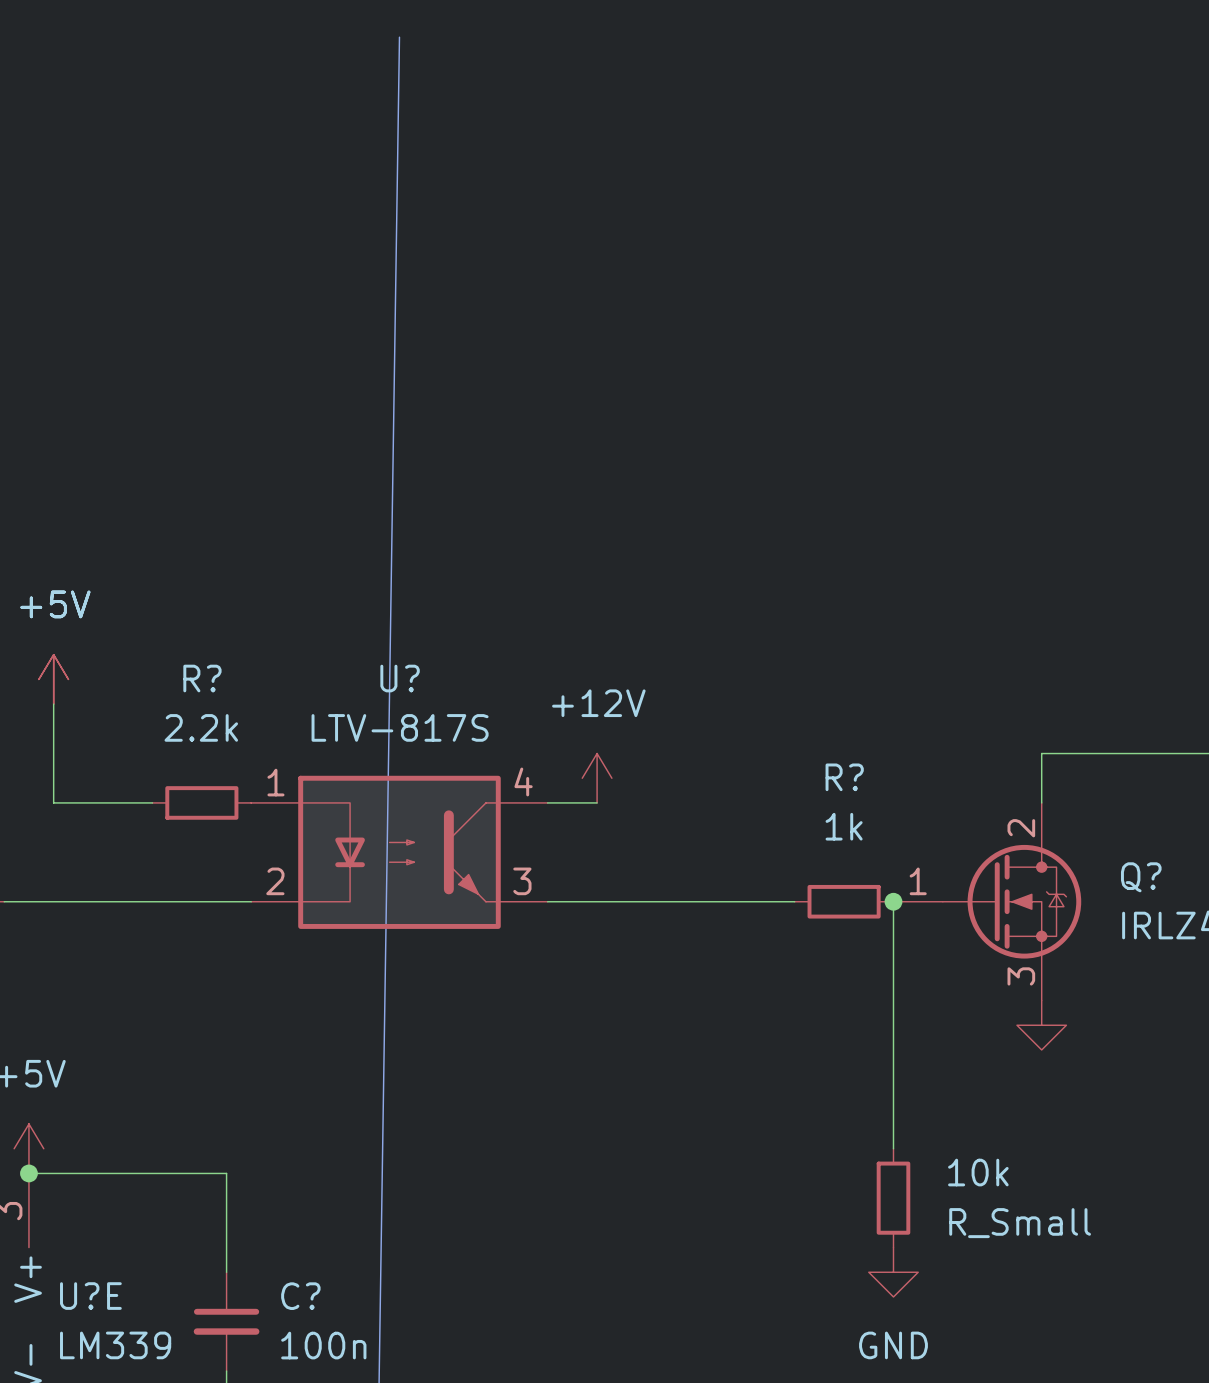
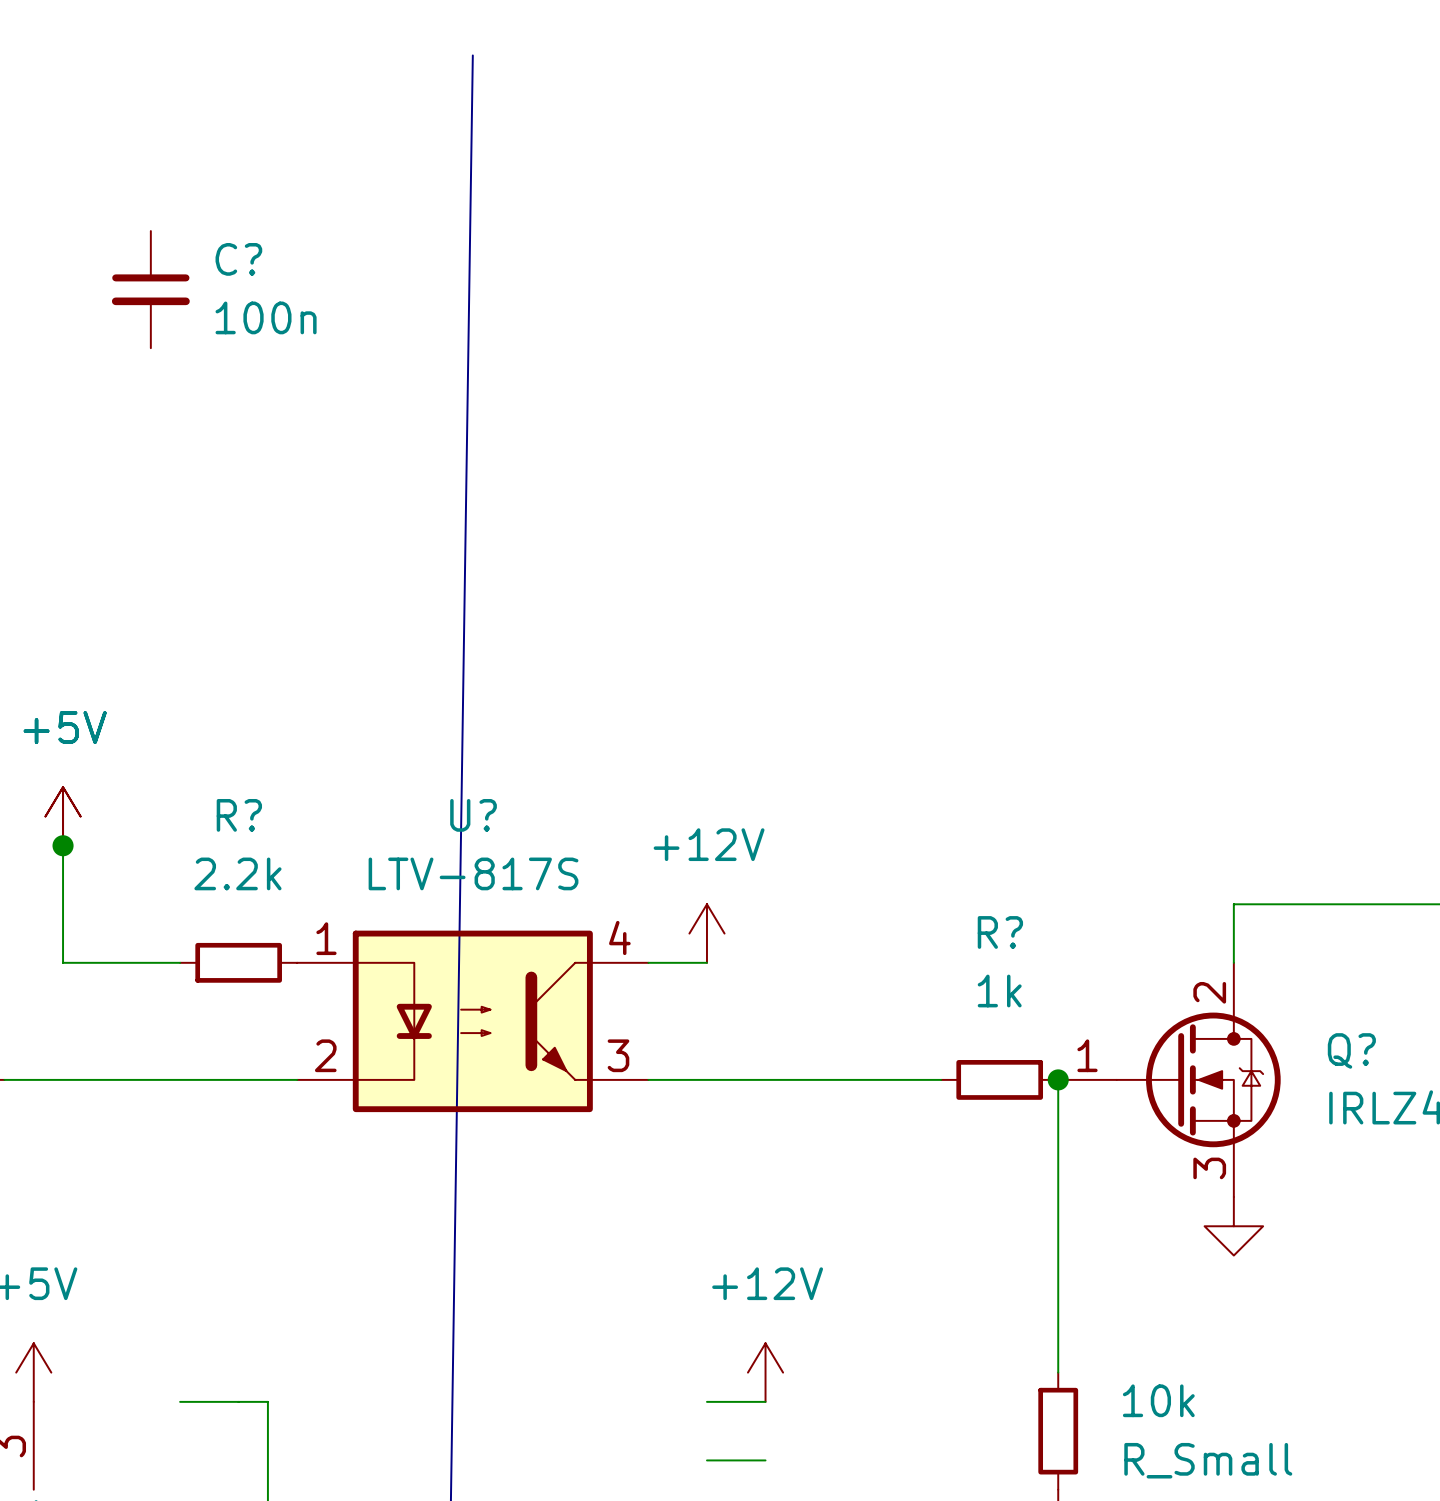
C?: none -> 100n (150, 289)
junction: none -> (63, 845)
power symbol: none -> +12V (765, 1372)
wire: (28, 1173) (152, 1173) -> none
junction: (28, 1173) -> none
wire: none -> (706, 1401) (765, 1401)
wire: none -> (706, 1460) (765, 1460)

